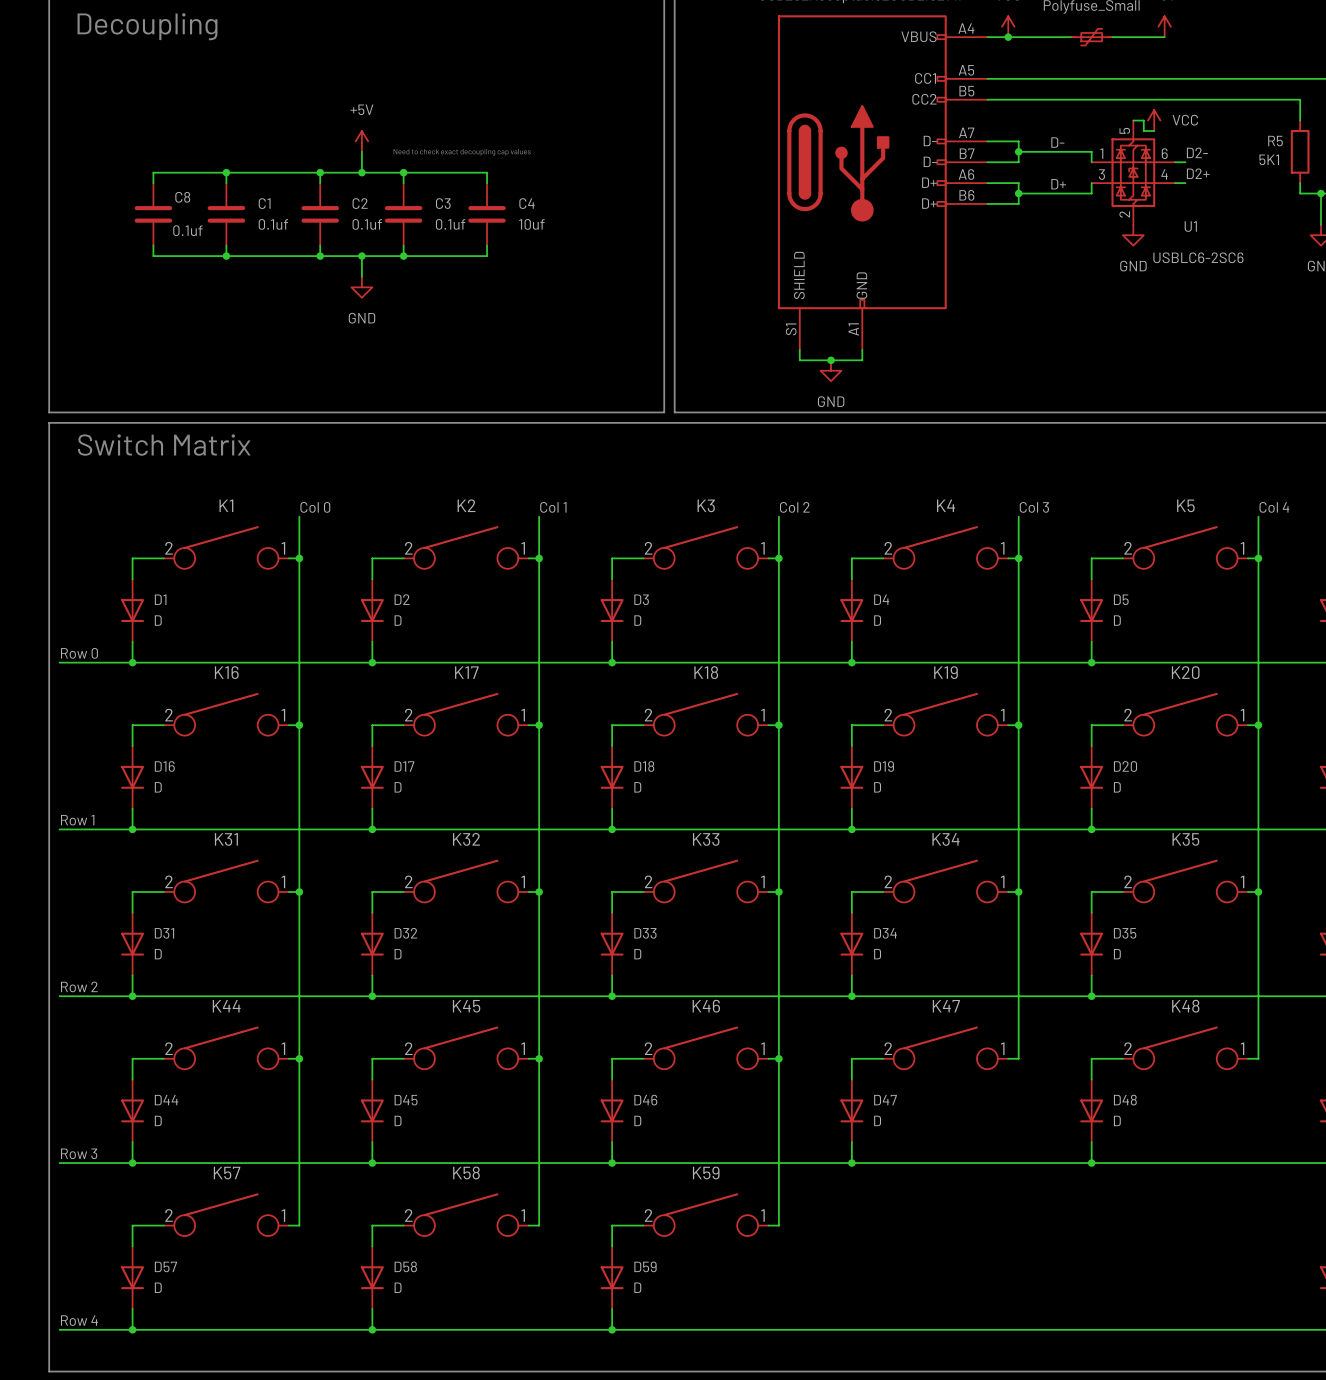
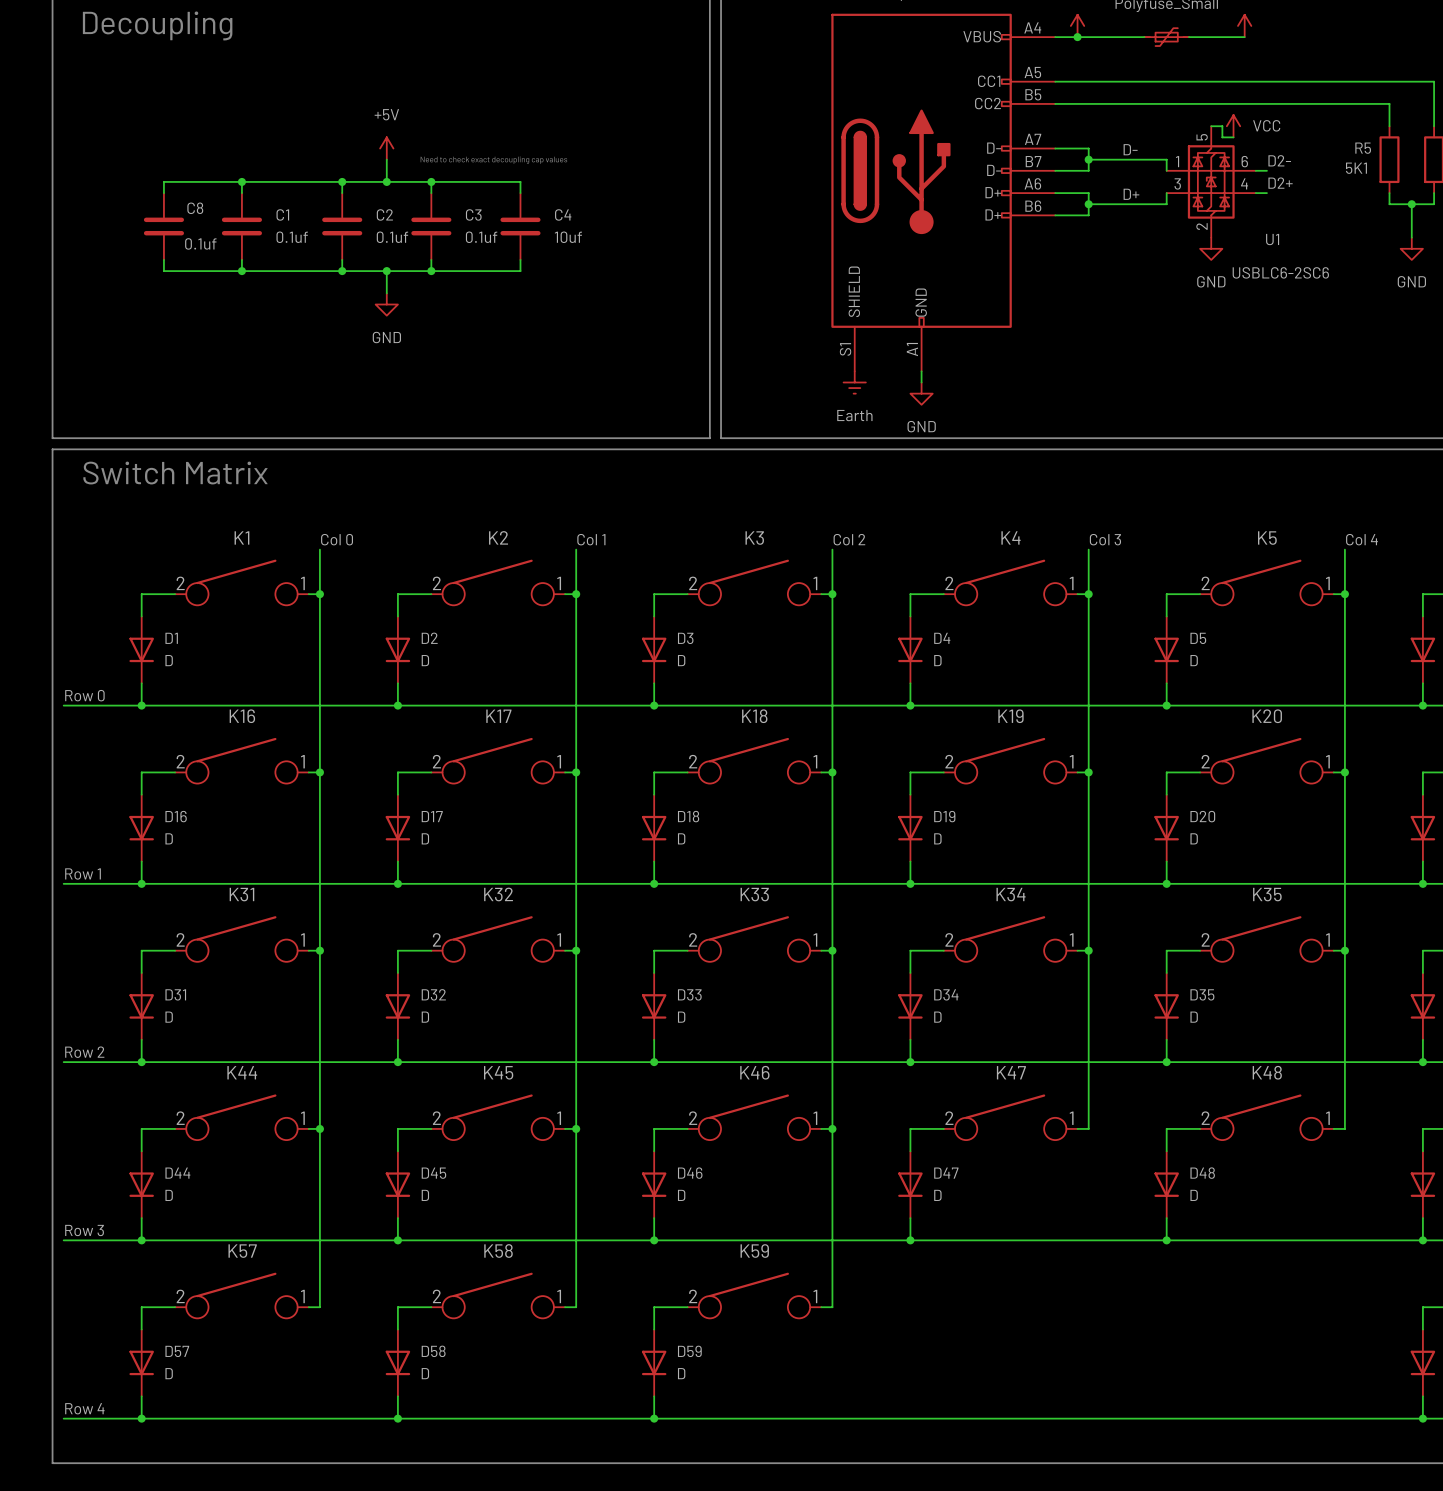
wire: (799, 349) (799, 360) (862, 360) -> none
power symbol: none -> Earth (854, 382)
junction: (831, 360) -> none
power symbol position: GND (831, 370) -> GND (921, 393)

